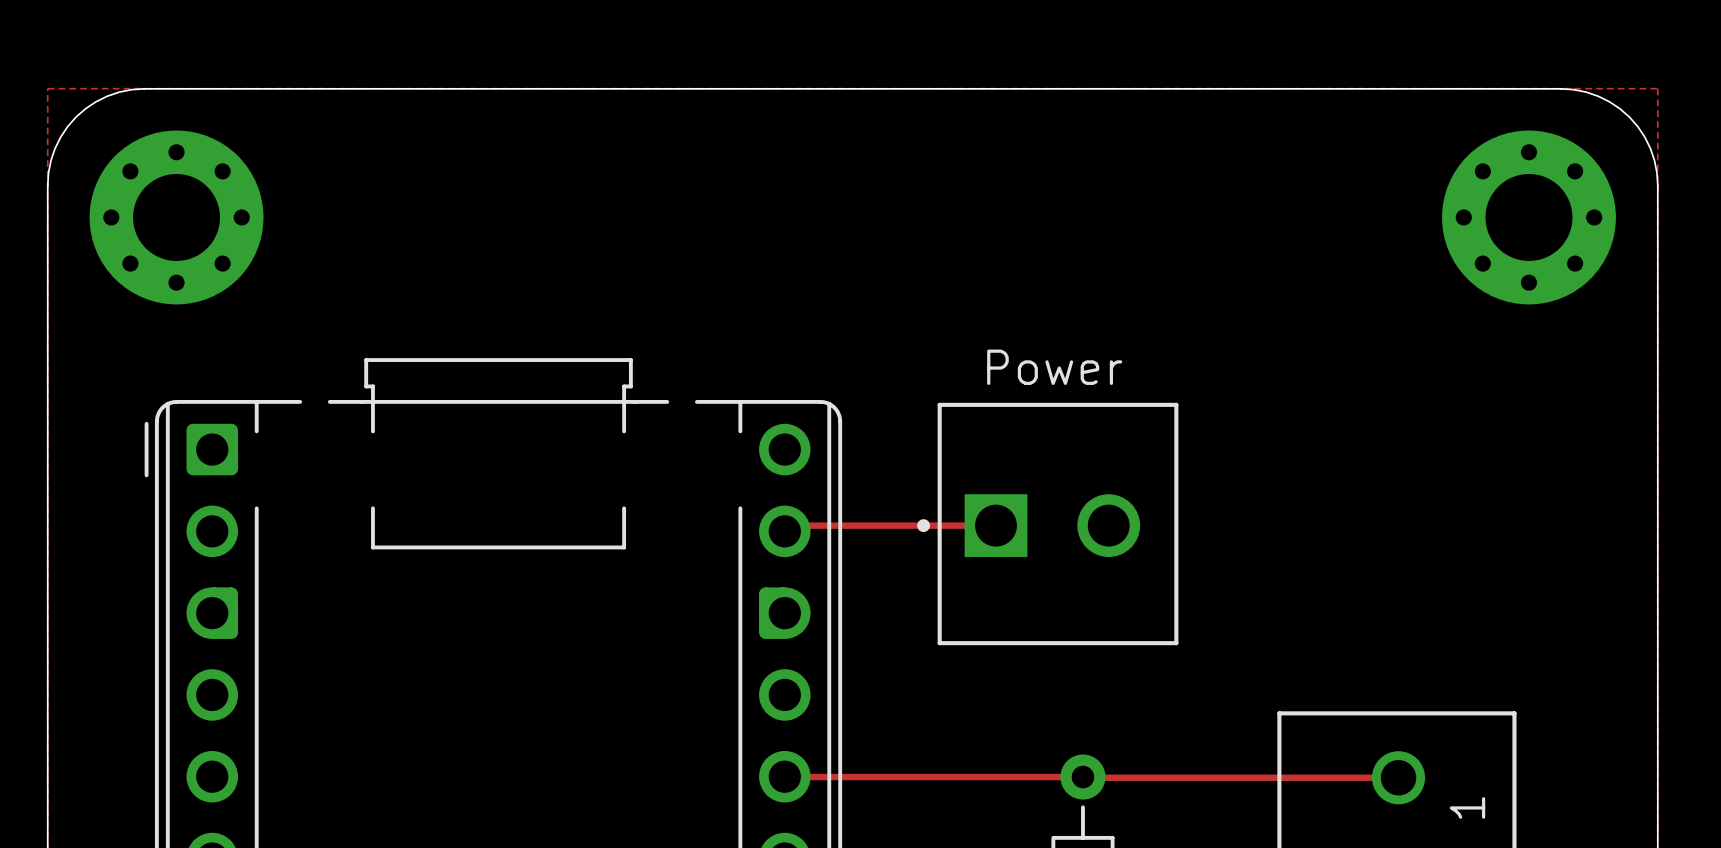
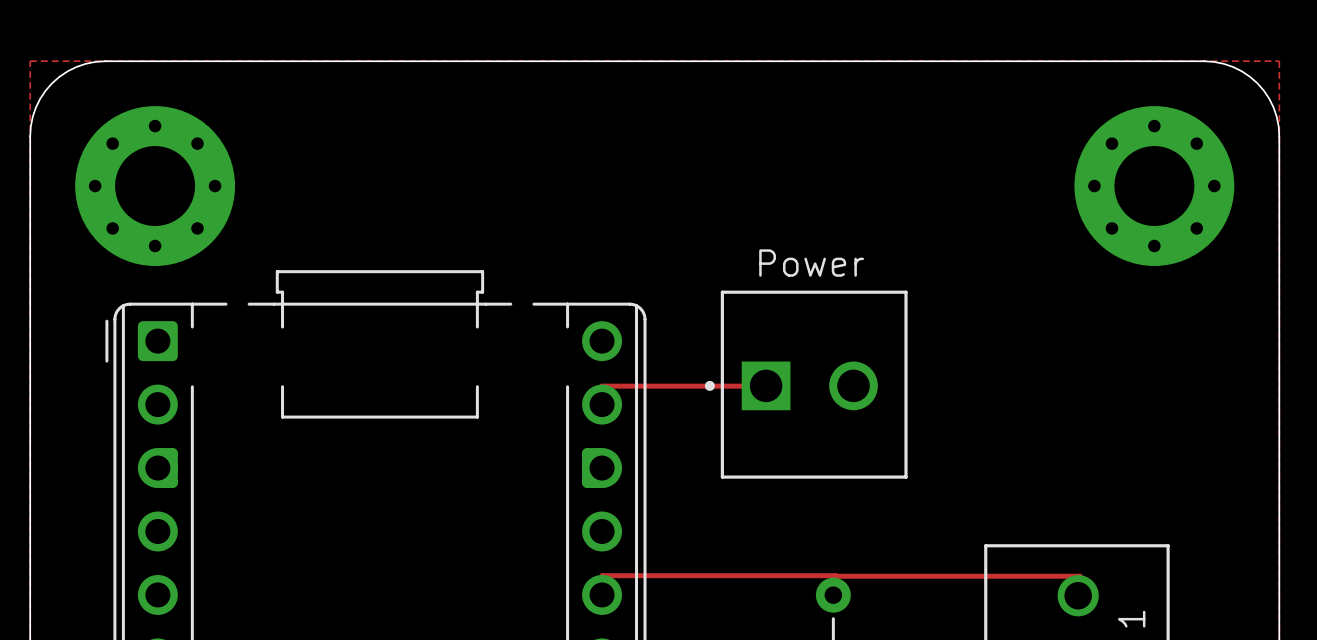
part: (176, 217) -> none
part: (1528, 217) -> none
part: none -> (155, 186)
part: none -> (1154, 186)
text position: Power (1054, 367) -> Power (811, 263)
track: none -> (601, 386) (765, 386)
part position: (1047, 524) -> (806, 384)
track: (996, 525) (790, 525) (784, 531) -> none
track: none -> (1080, 576) (601, 576)
track: (785, 777) (1398, 777) -> none

